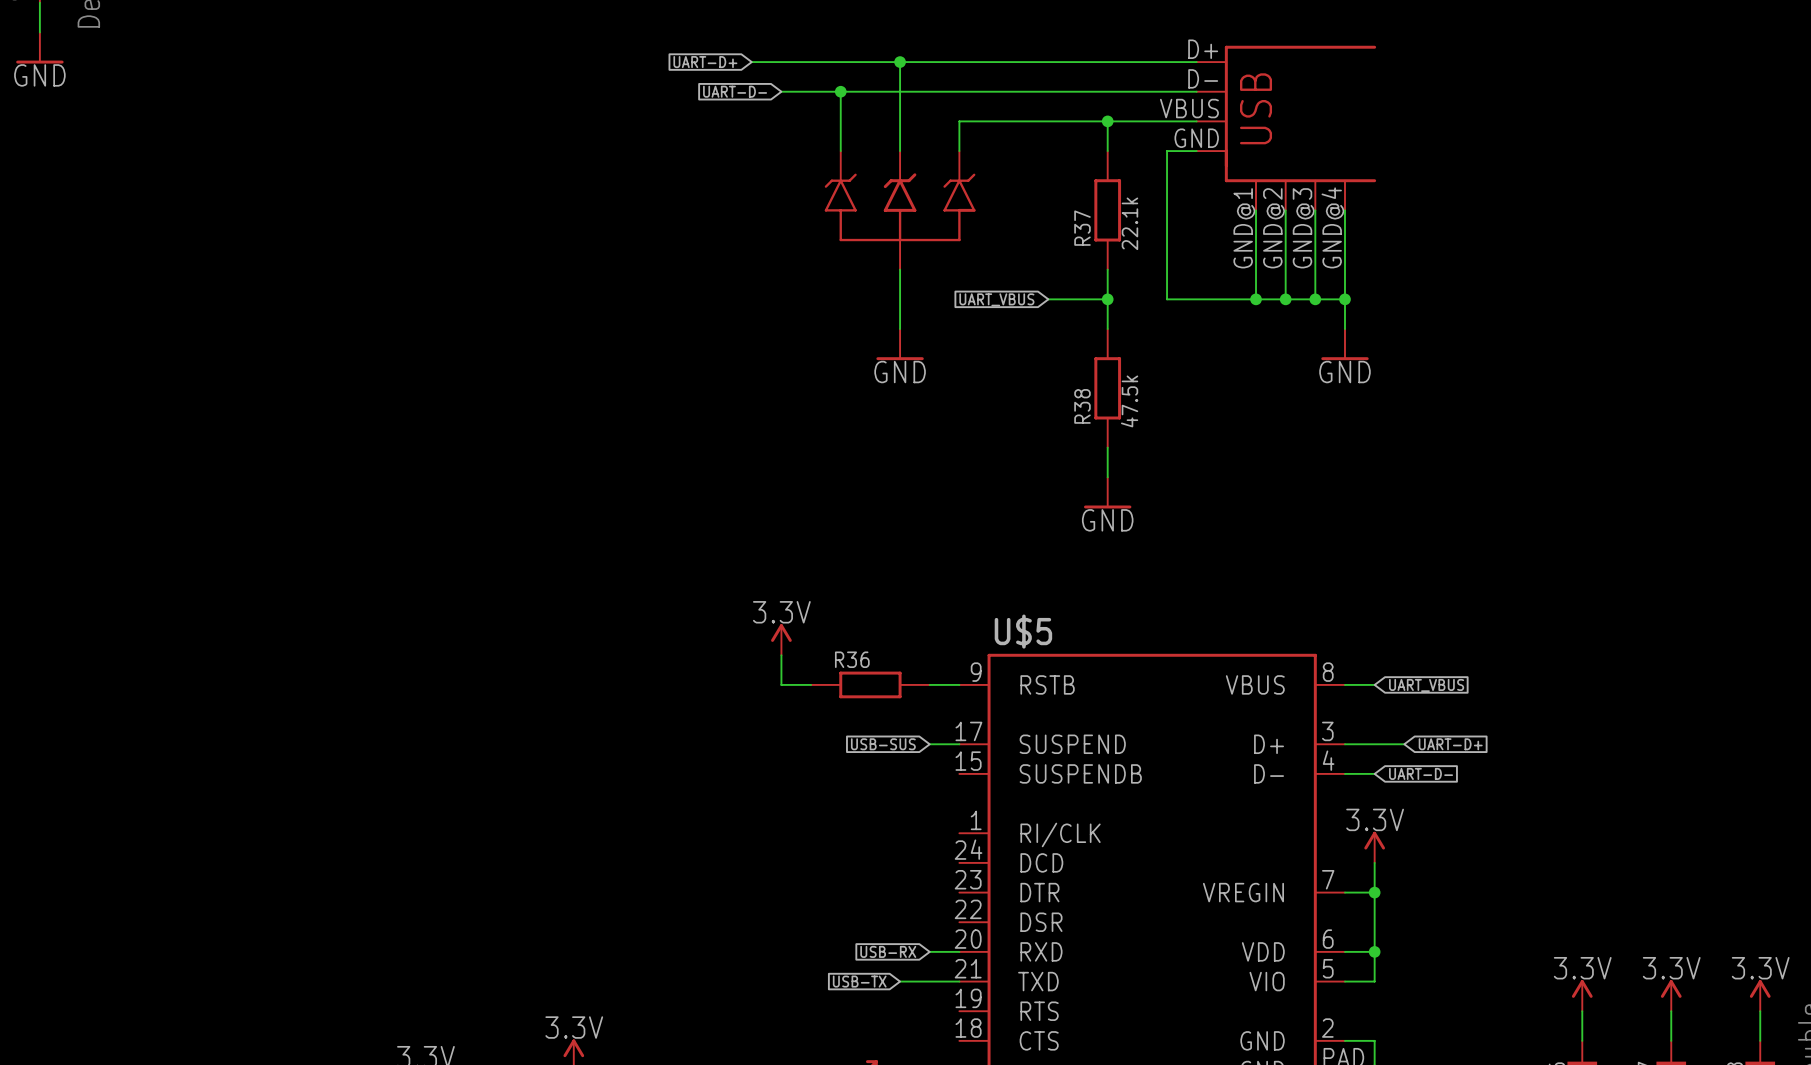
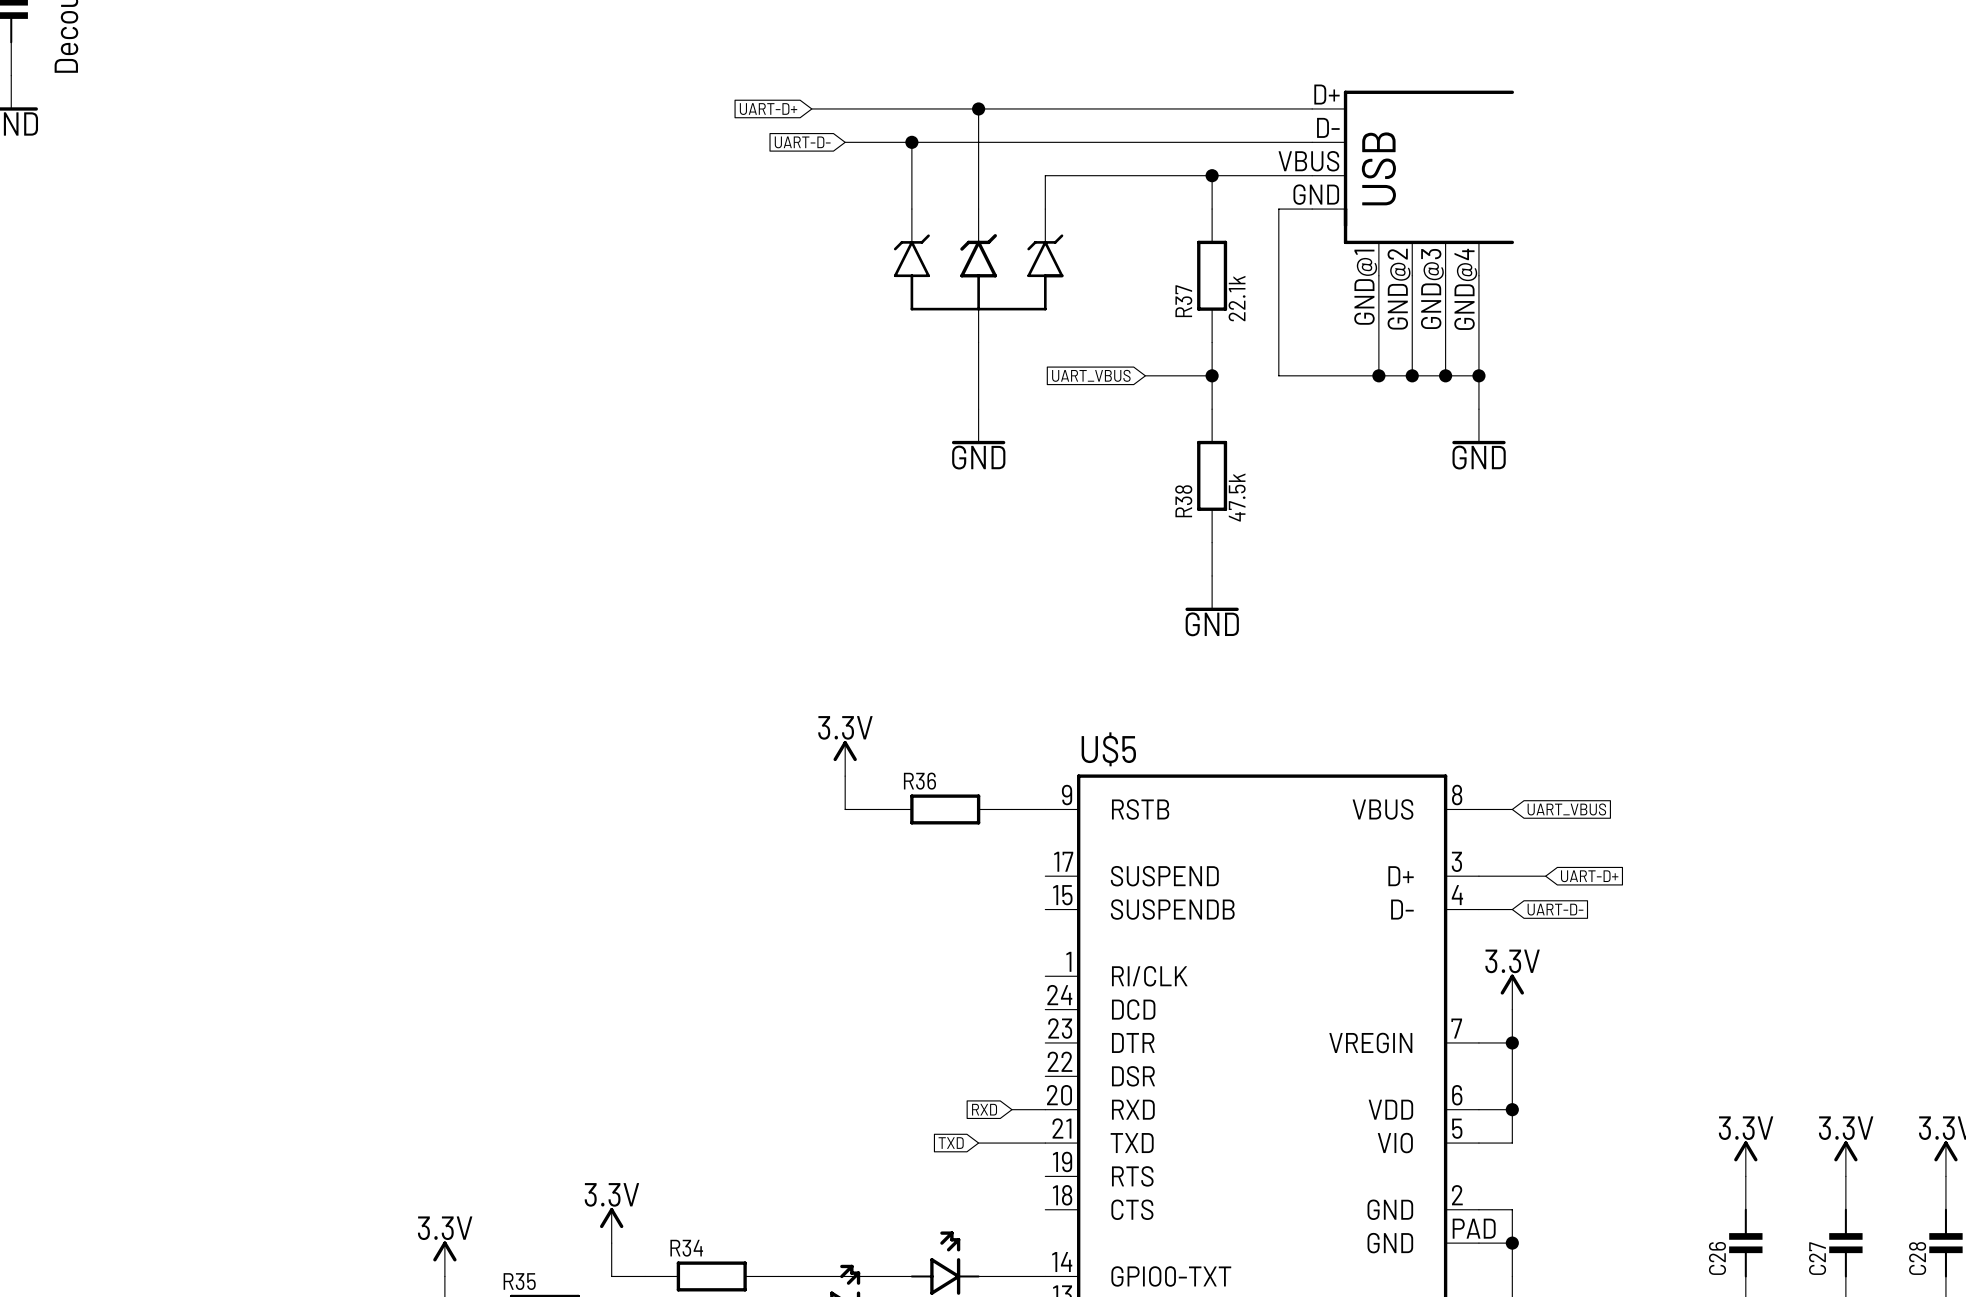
global label: USB-SUS (883, 744) -> none
wire: (929, 744) (959, 744) -> none
global label: USB-RX (888, 951) -> RXD (984, 1109)
global label: USB-TX (859, 981) -> TXD (951, 1143)

